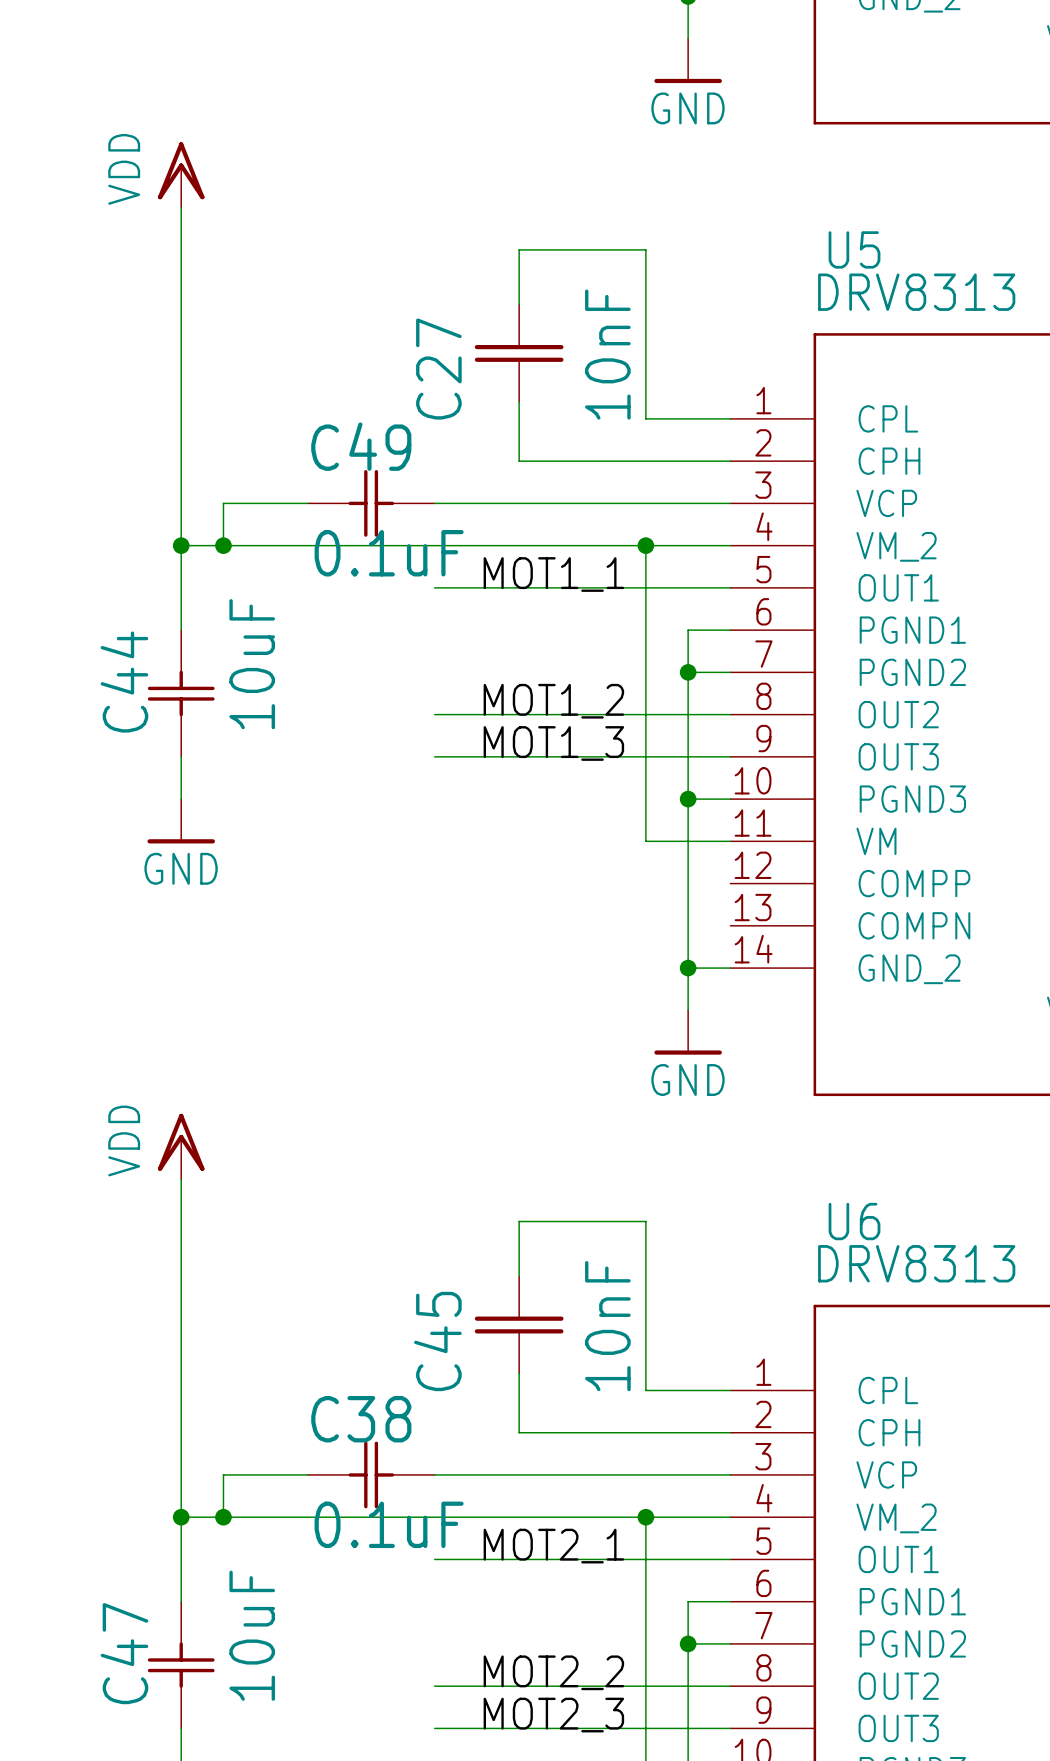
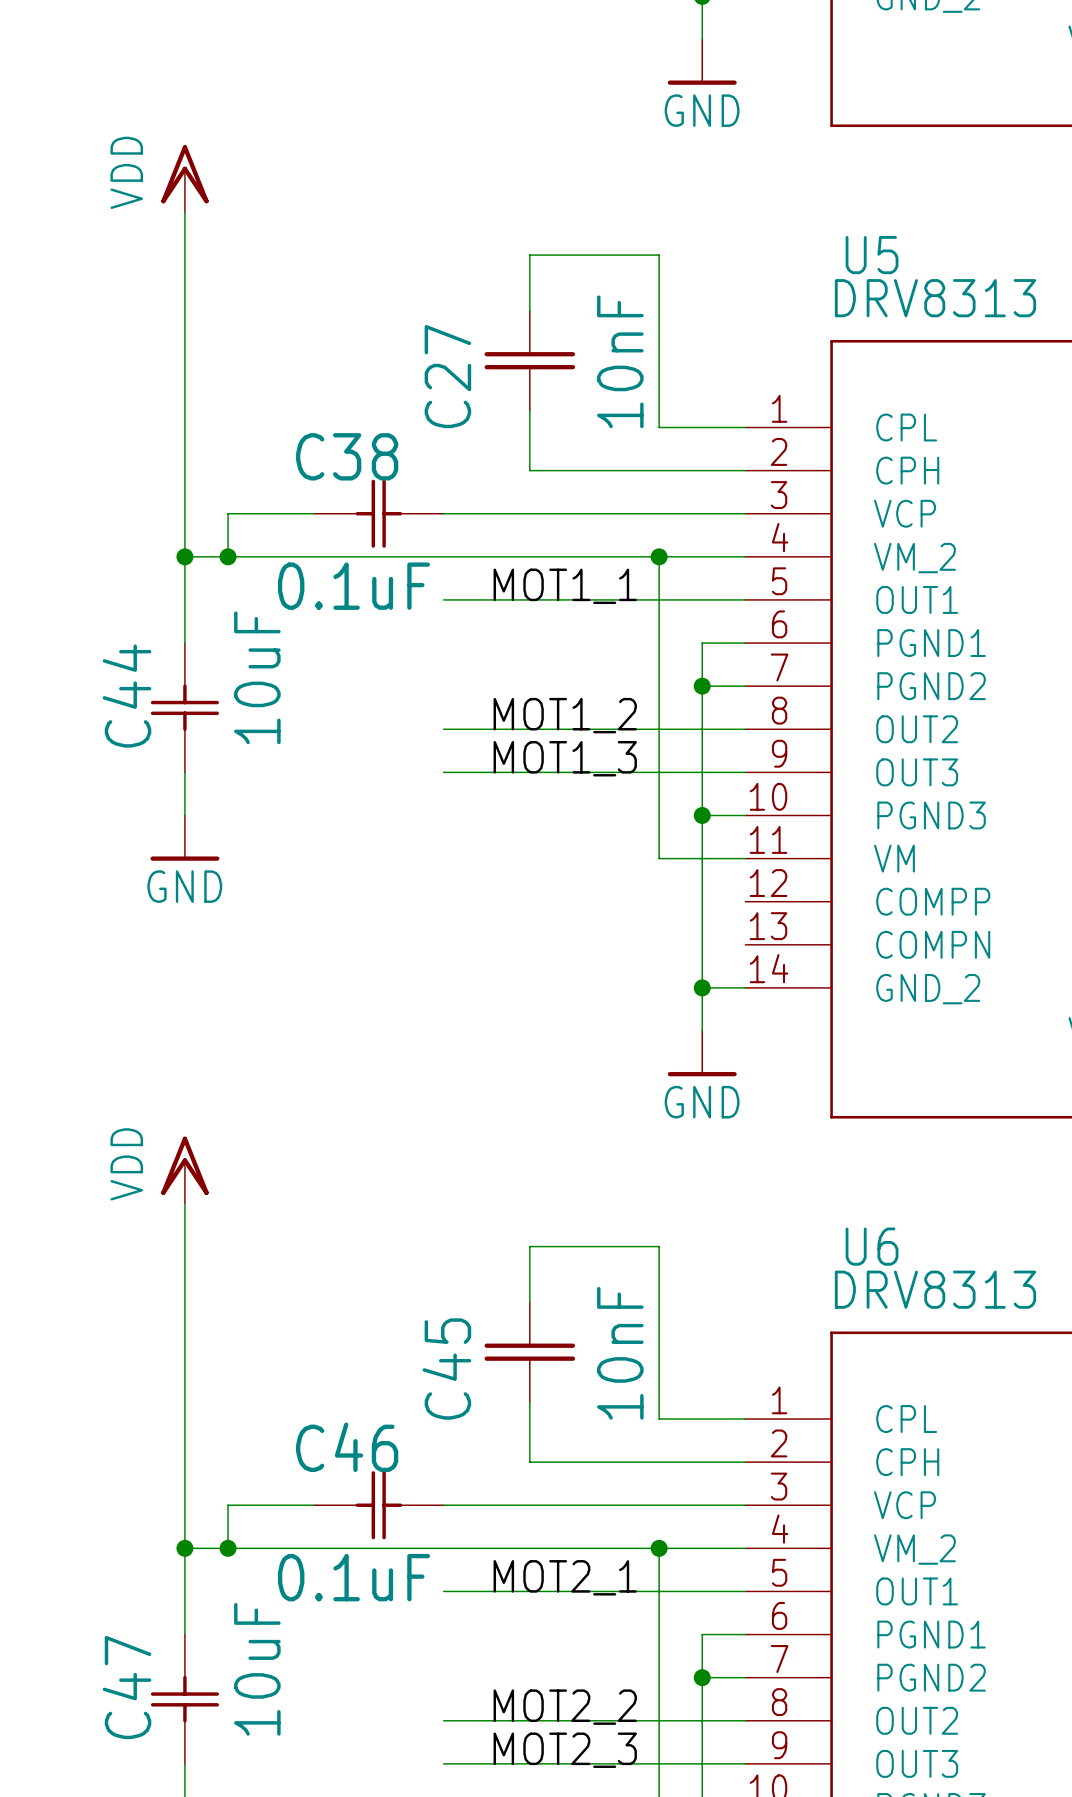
C49 name: C49 (361, 446) -> C38 (347, 456)
C49 value position: 0.1uF (389, 553) -> 0.1uF (353, 586)
C38 name: C38 (361, 1419) -> C46 (347, 1447)
C38 value position: 0.1uF (389, 1524) -> 0.1uF (353, 1577)

